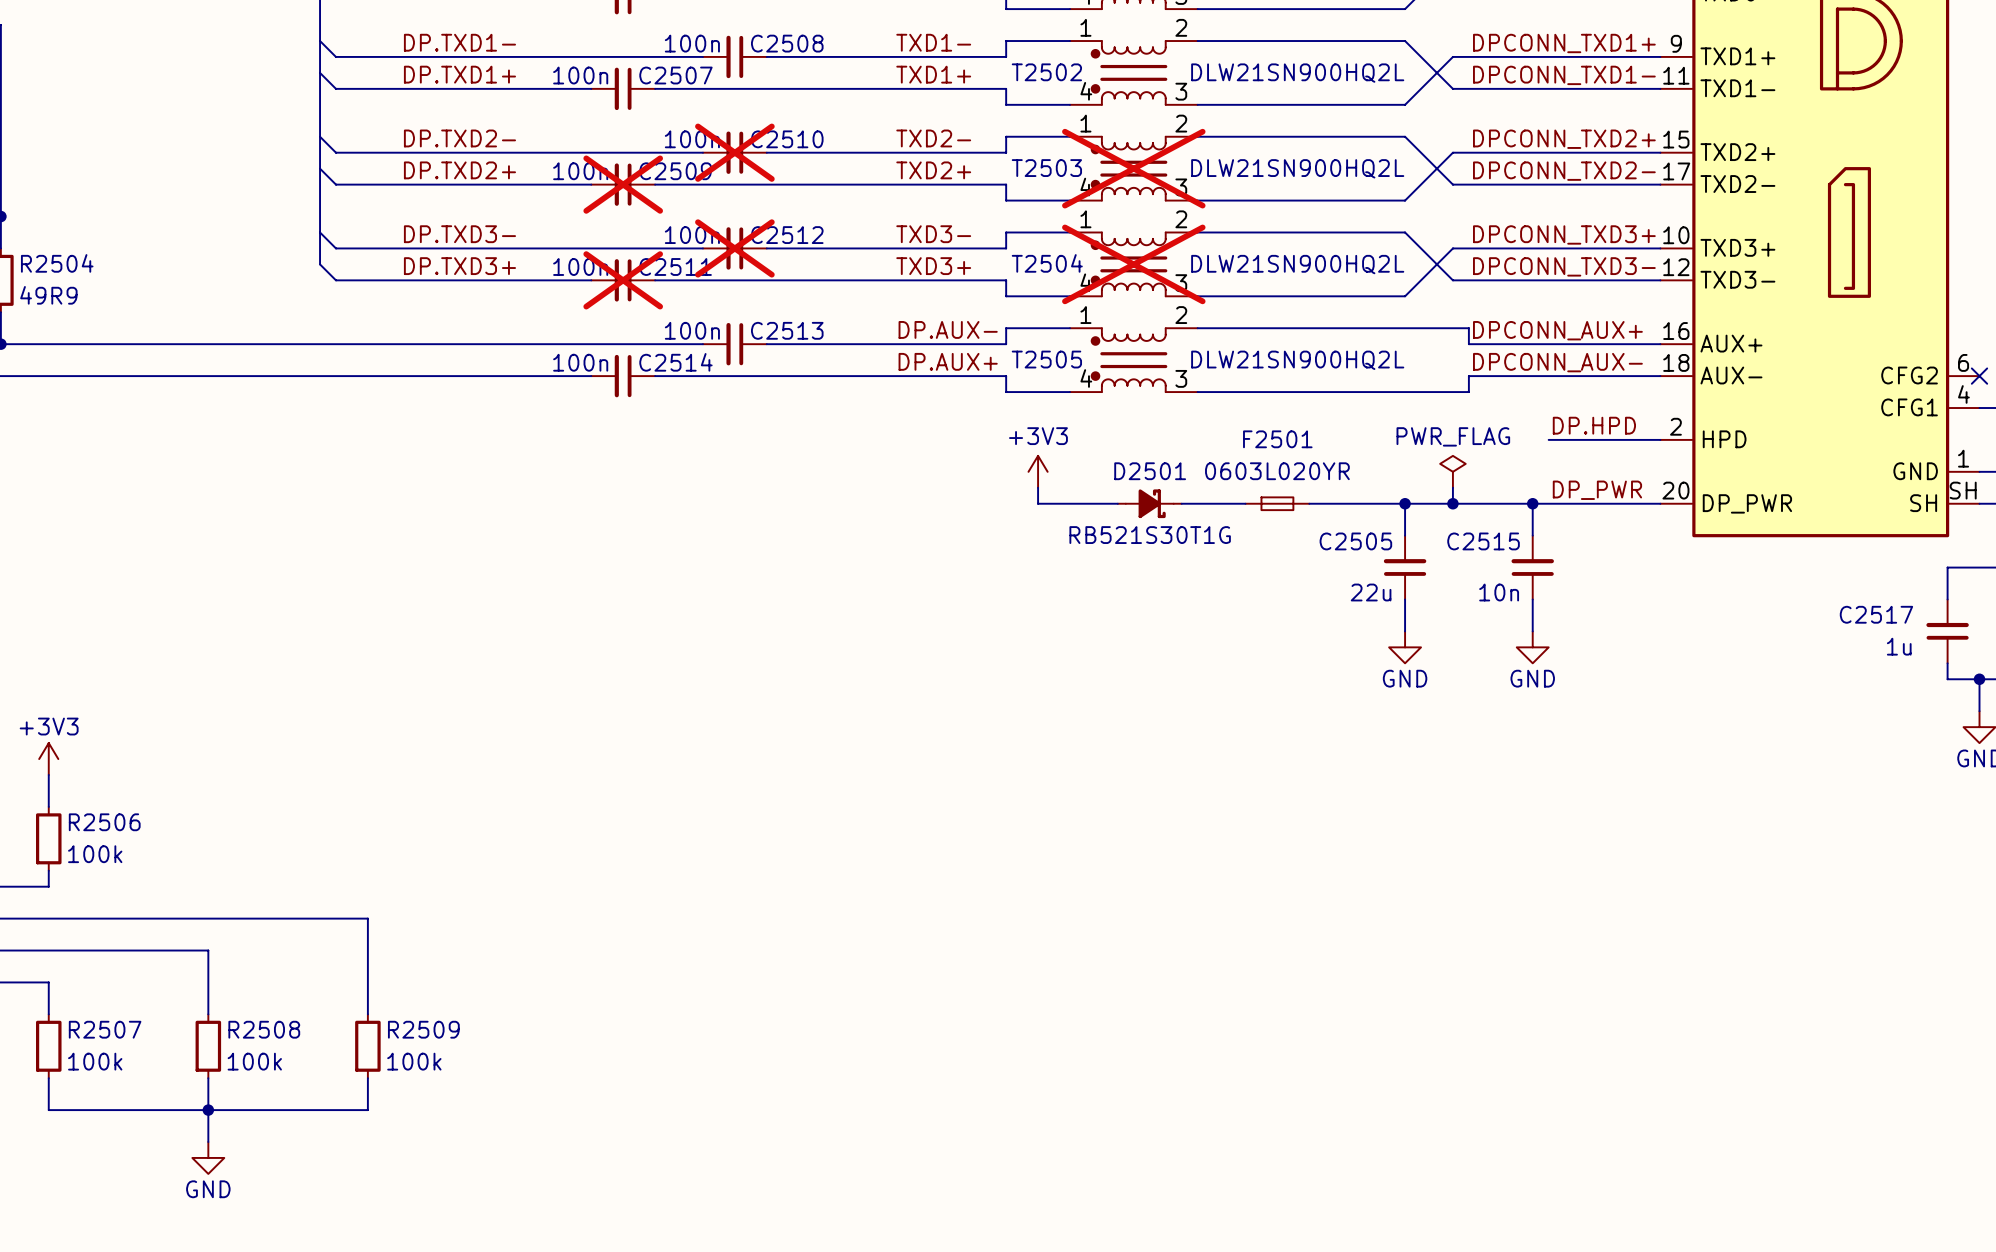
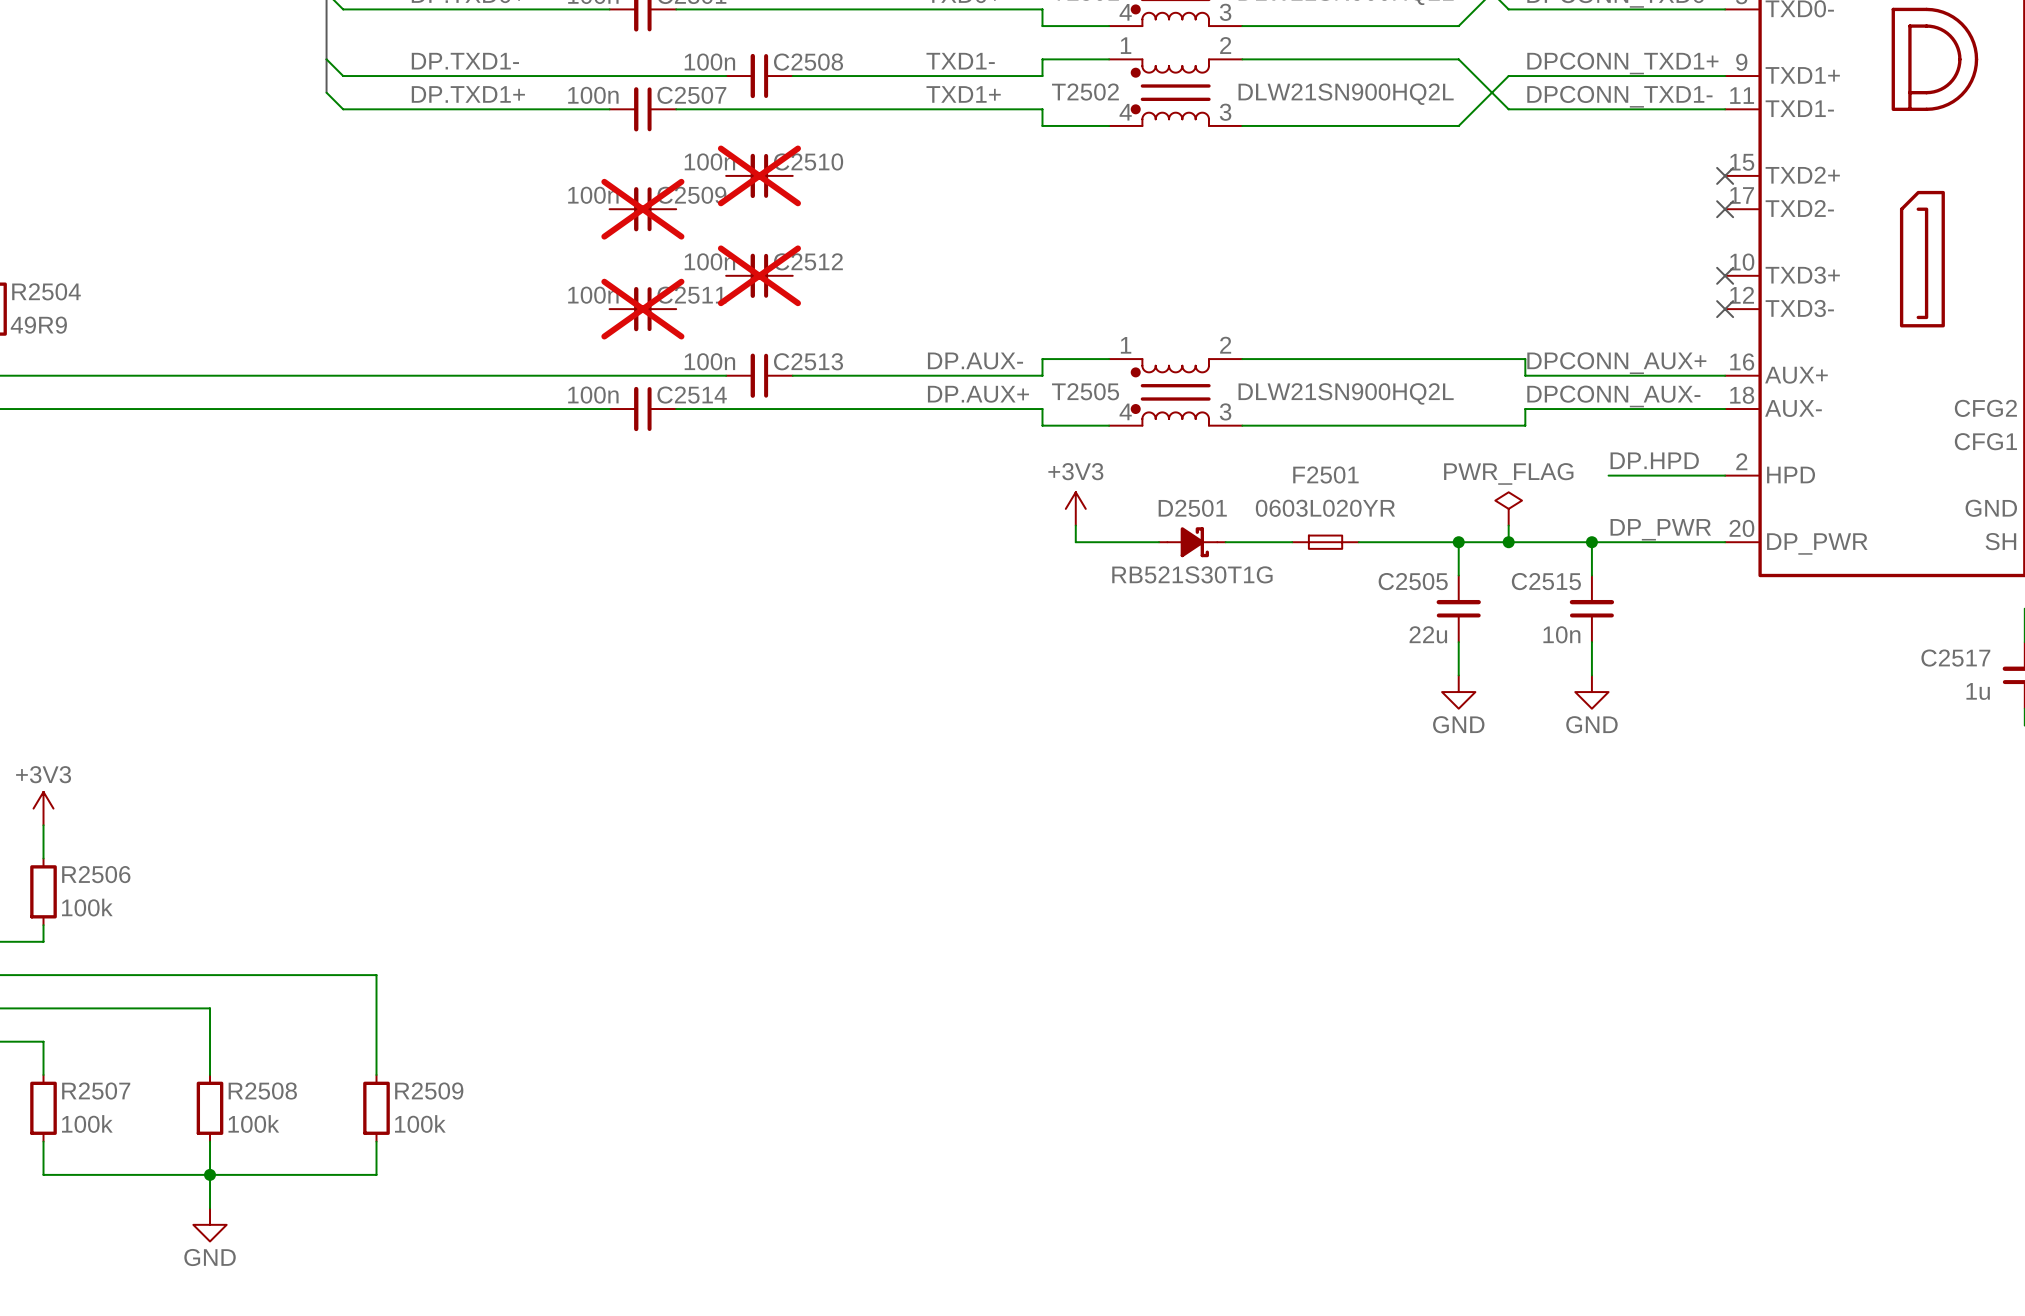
bus: (320, 72) (320, 264) -> none
wire: (320, 136) (335, 152) (702, 152) -> none
wire: (1069, 136) (1006, 136) (1006, 152) (766, 152) -> none
wire: (1197, 136) (1405, 136) (1452, 184) (1660, 184) -> none
label: DP.TXD2- (459, 138) -> none
label: TXD2- (933, 138) -> none
label: DPCONN_TXD2+ (1564, 139) -> none
wire: (1660, 152) (1452, 152) (1405, 200) (1197, 200) -> none
no-connect mark: none -> (1725, 175)
wire: (320, 168) (335, 184) (591, 184) -> none
T2503: (1133, 168) -> none
label: DP.TXD2+ (459, 170) -> none
label: TXD2+ (933, 170) -> none
label: DPCONN_TXD2- (1564, 171) -> none
wire: (655, 184) (1006, 184) (1006, 200) (1069, 200) -> none
no-connect mark: none -> (1725, 209)
wire: (320, 232) (335, 248) (702, 248) -> none
wire: (1069, 232) (1006, 232) (1006, 248) (766, 248) -> none
wire: (1197, 232) (1405, 232) (1452, 280) (1660, 280) -> none
label: DP.TXD3- (459, 234) -> none
label: TXD3- (933, 234) -> none
label: DPCONN_TXD3+ (1564, 234) -> none
wire: (1660, 248) (1452, 248) (1405, 296) (1197, 296) -> none
no-connect mark: none -> (1725, 275)
wire: (320, 264) (335, 280) (591, 280) -> none
T2504: (1133, 264) -> none
label: DP.TXD3+ (459, 266) -> none
label: TXD3+ (933, 266) -> none
label: DPCONN_TXD3- (1564, 266) -> none
wire: (655, 280) (1006, 280) (1006, 296) (1069, 296) -> none
no-connect mark: none -> (1725, 309)

